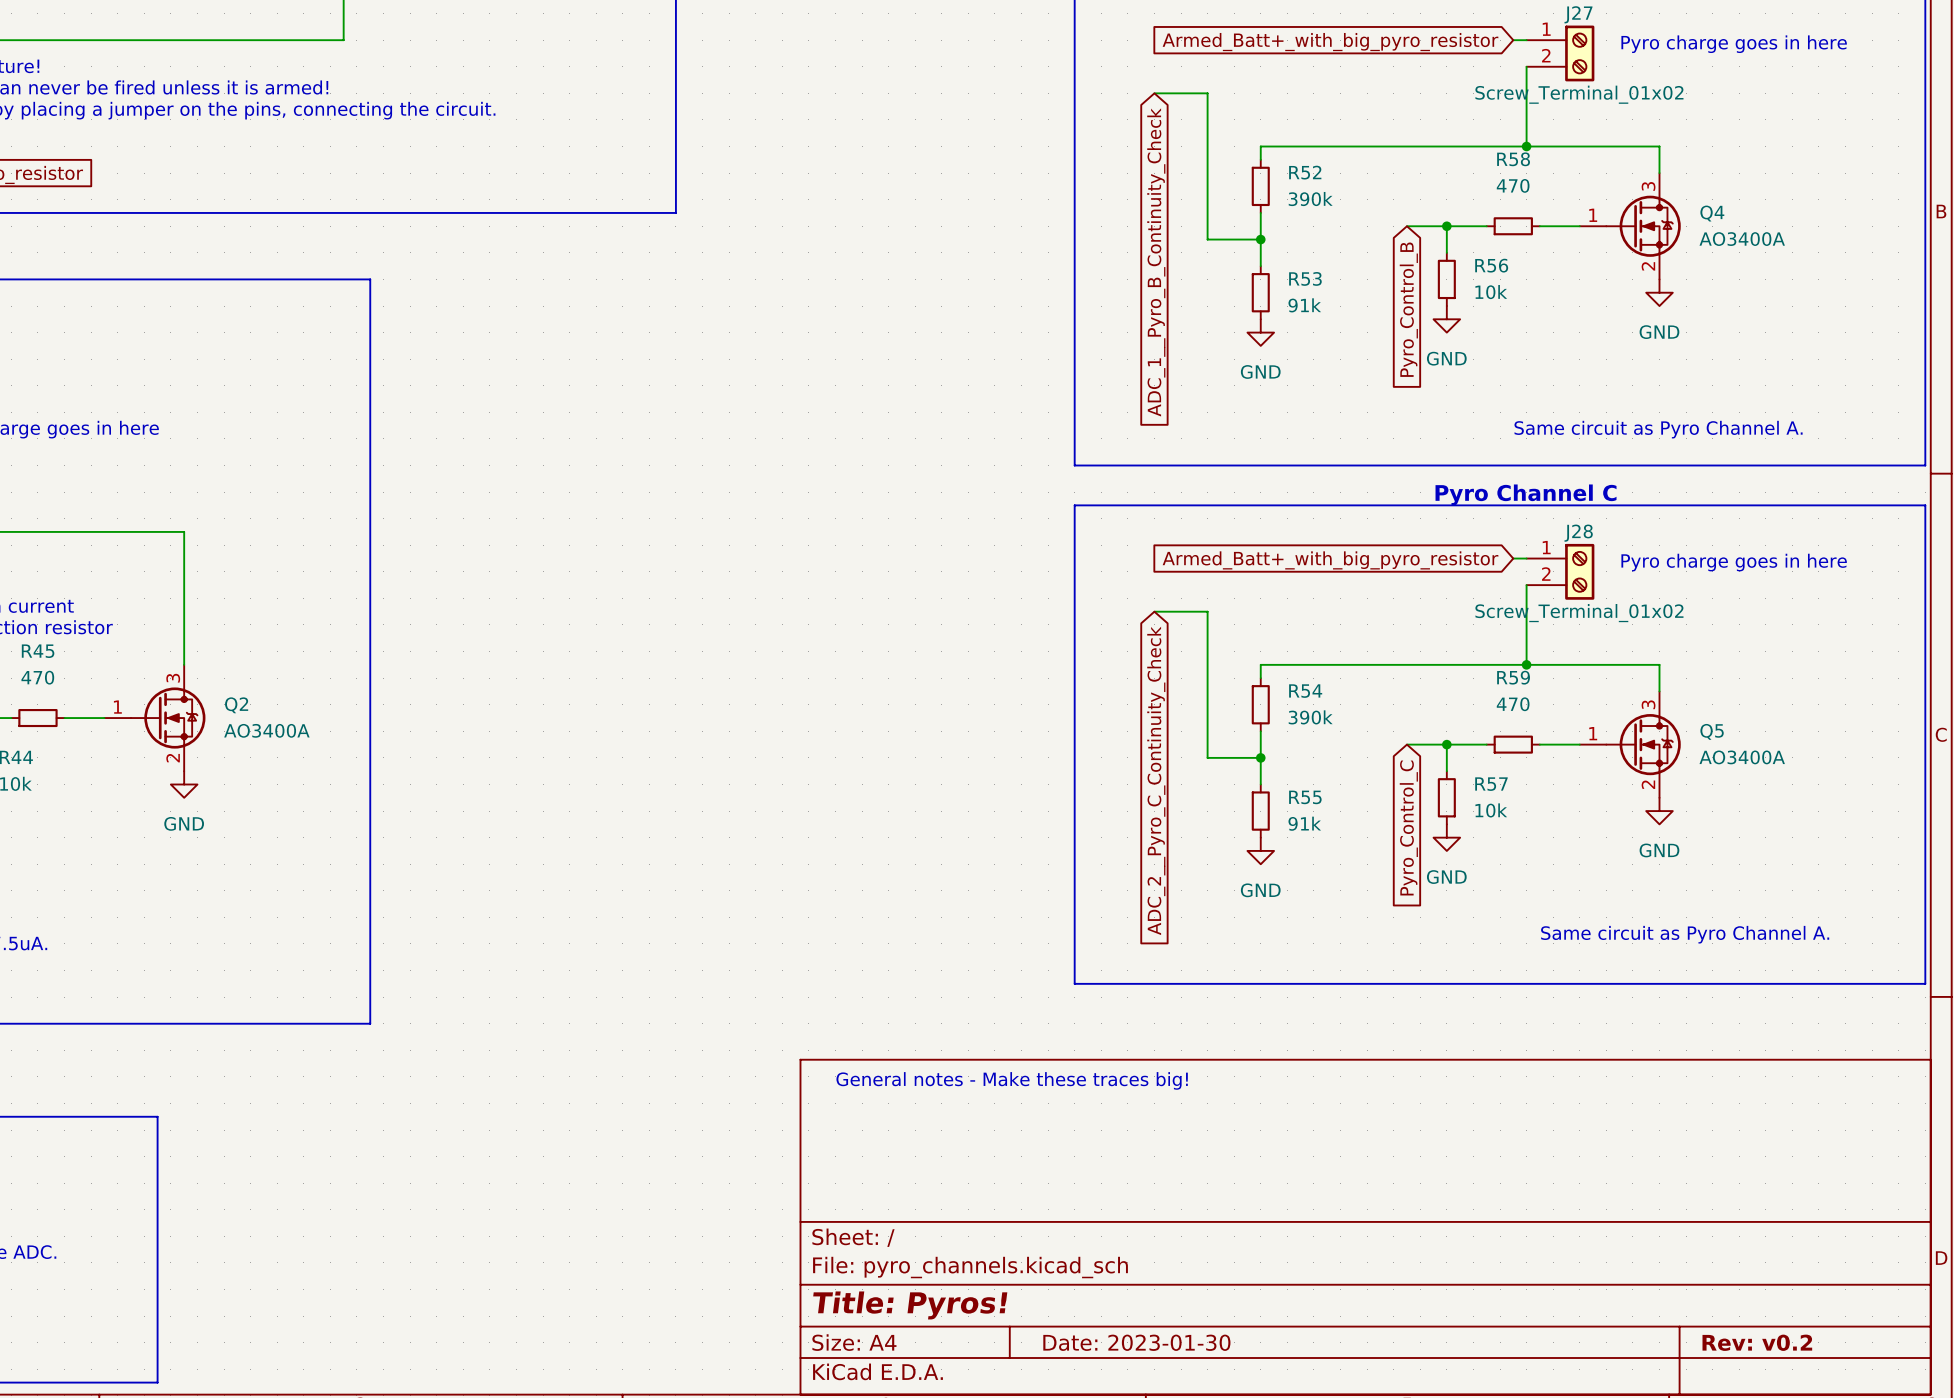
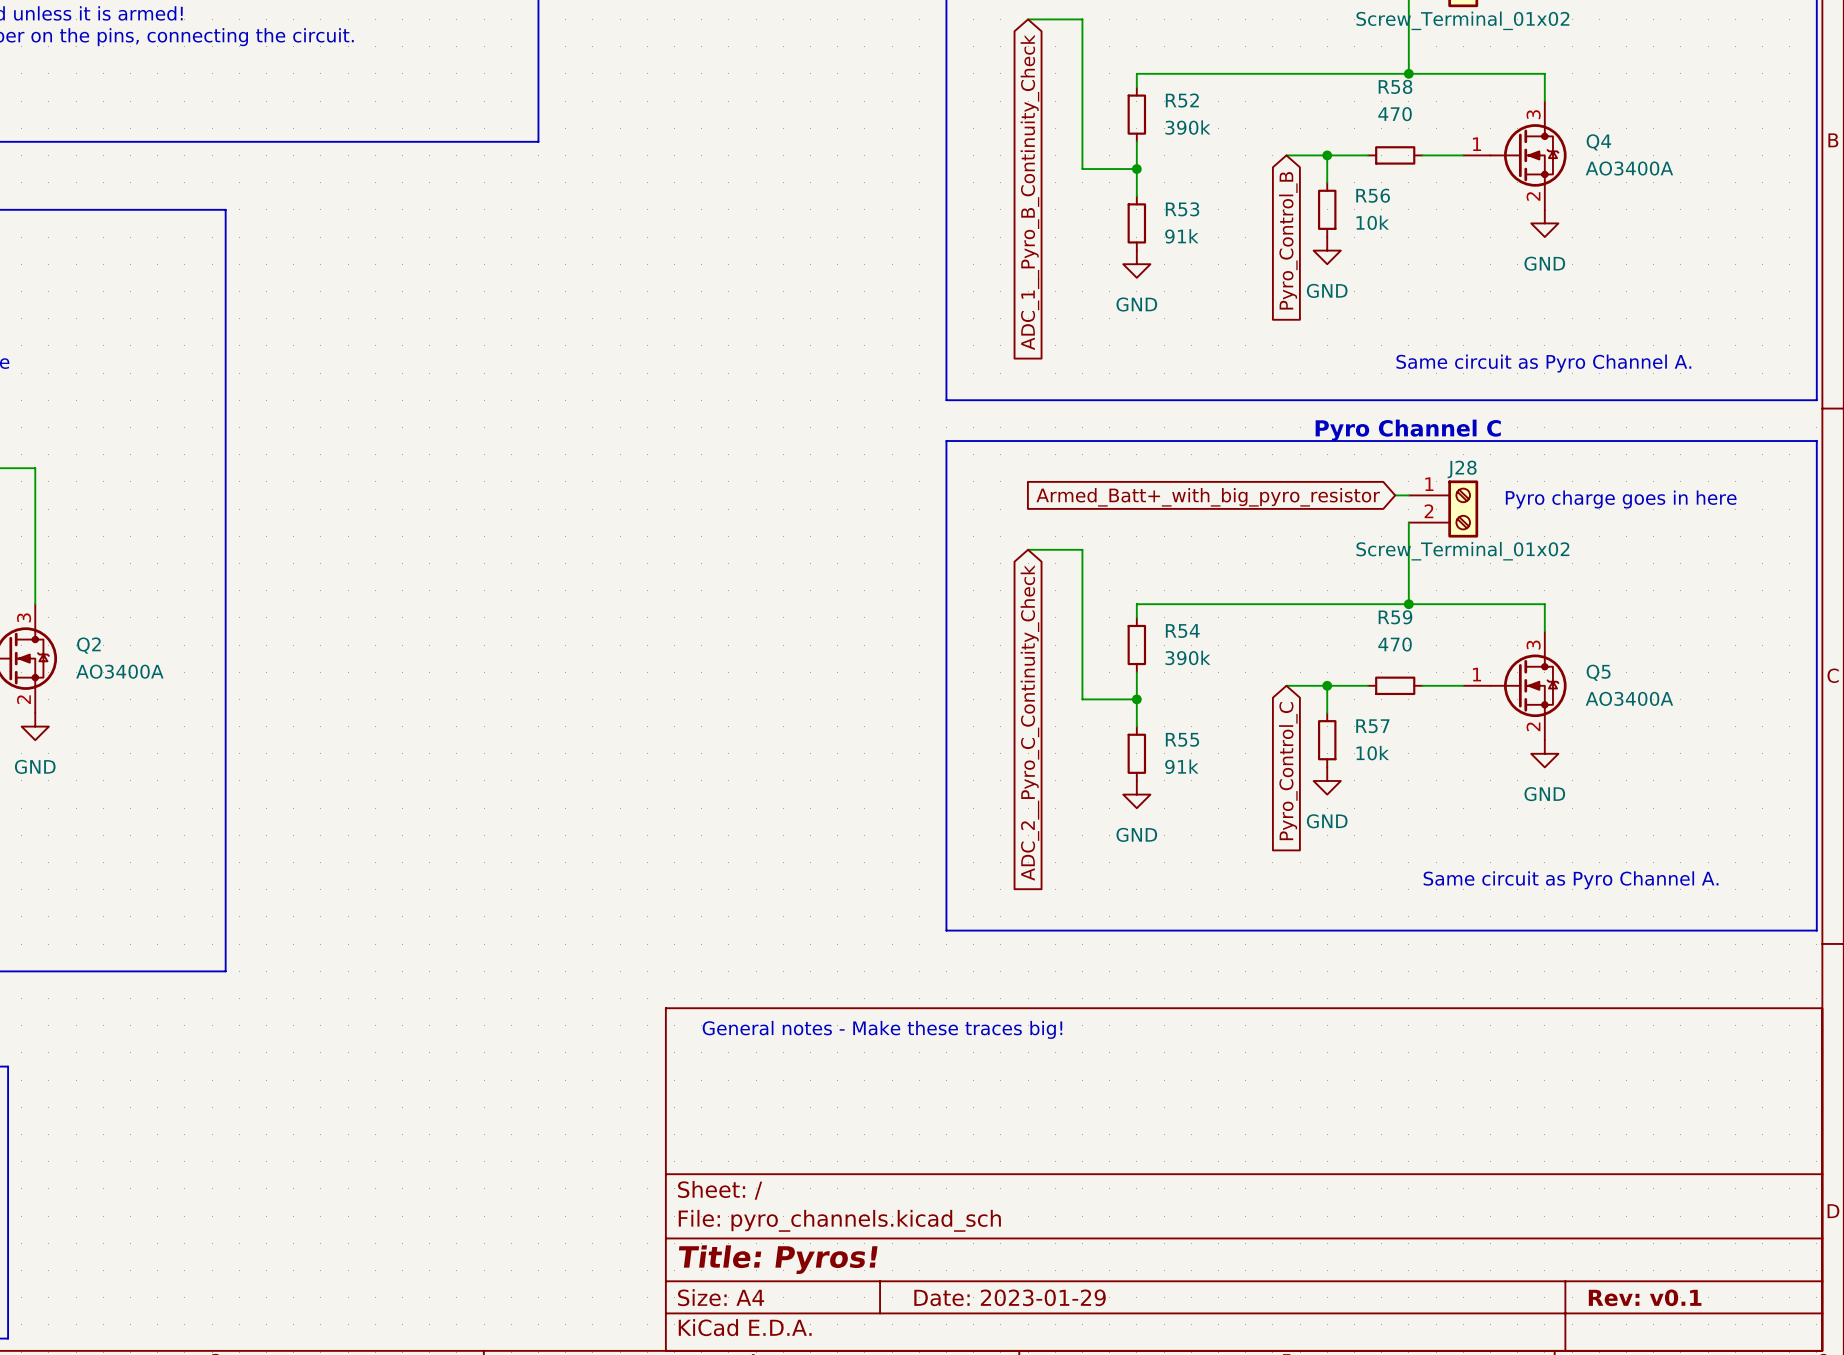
title block: Date: 2023-01-30 (1136, 1342) -> Date: 2023-01-29 (1010, 1297)
title block: Rev: v0.2 (1757, 1342) -> Rev: v0.1 (1645, 1297)

